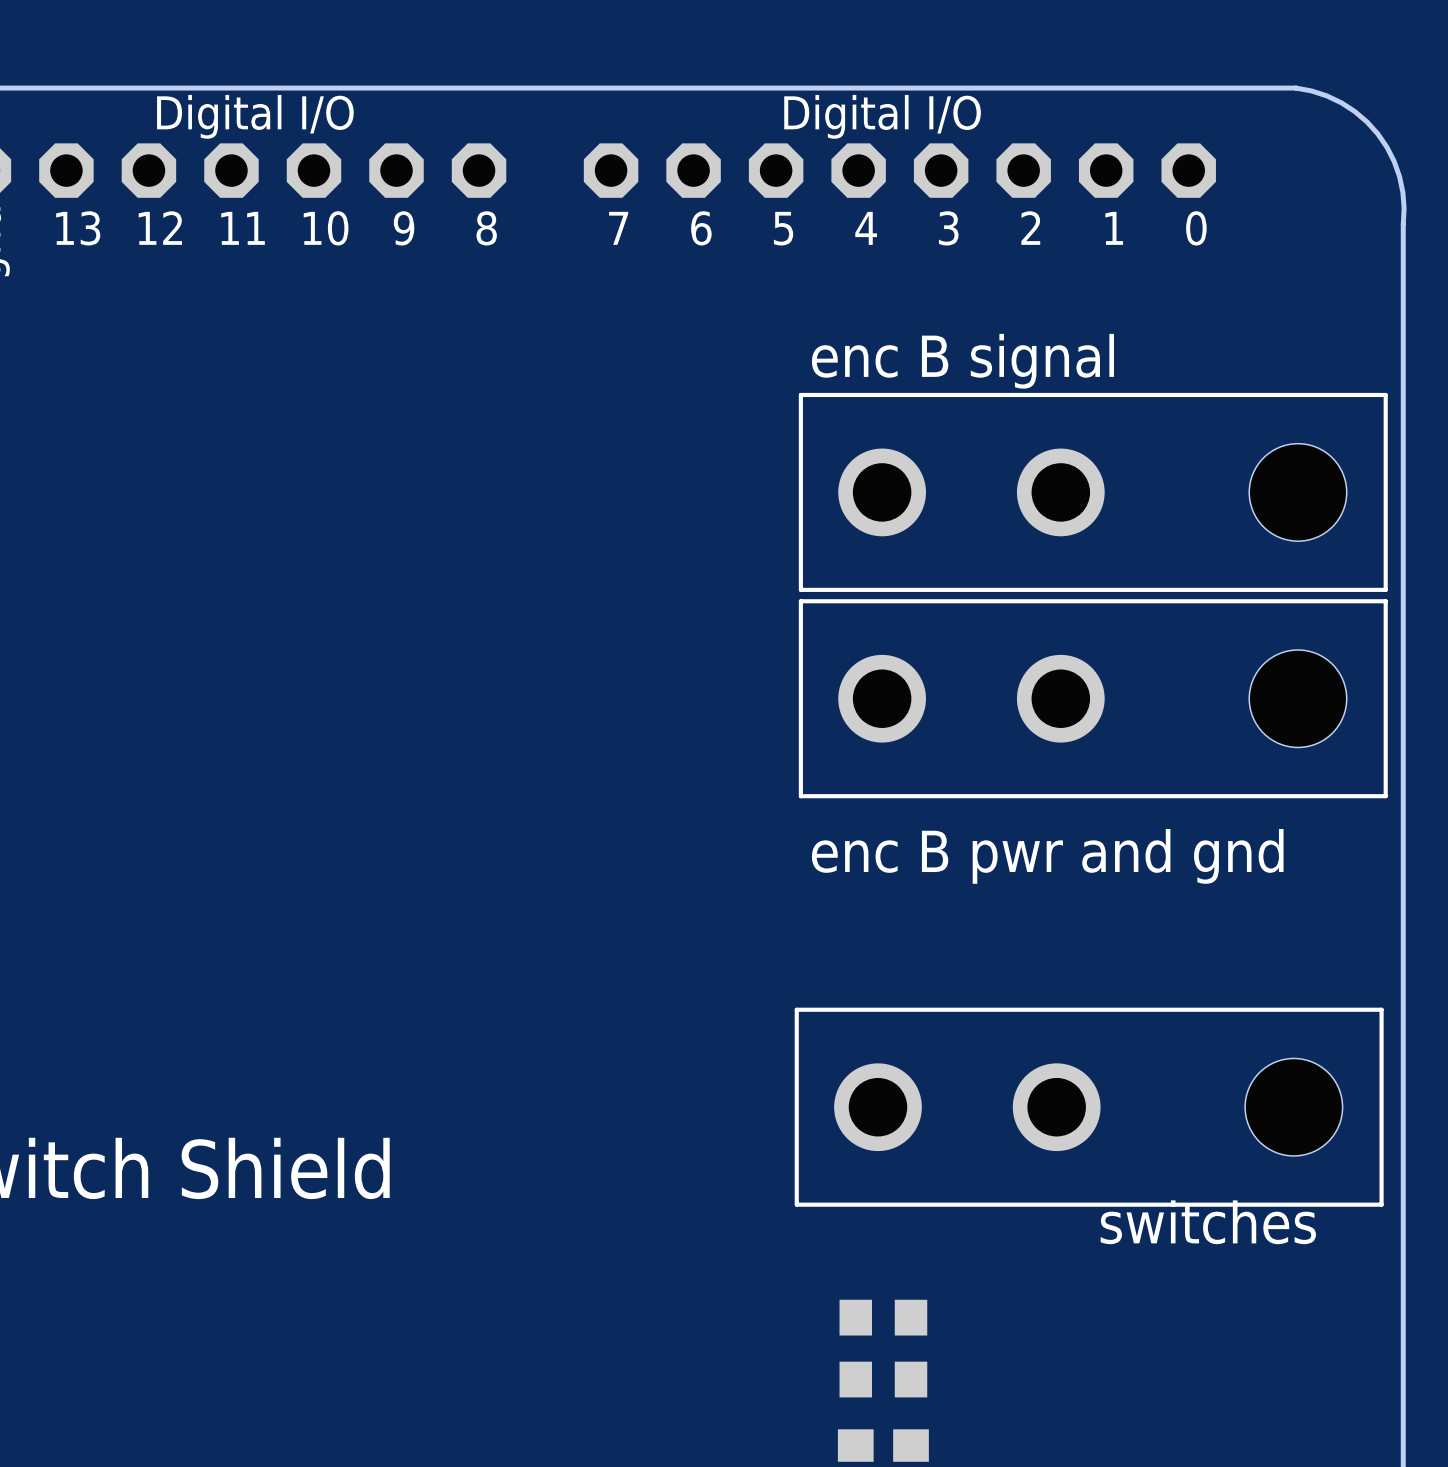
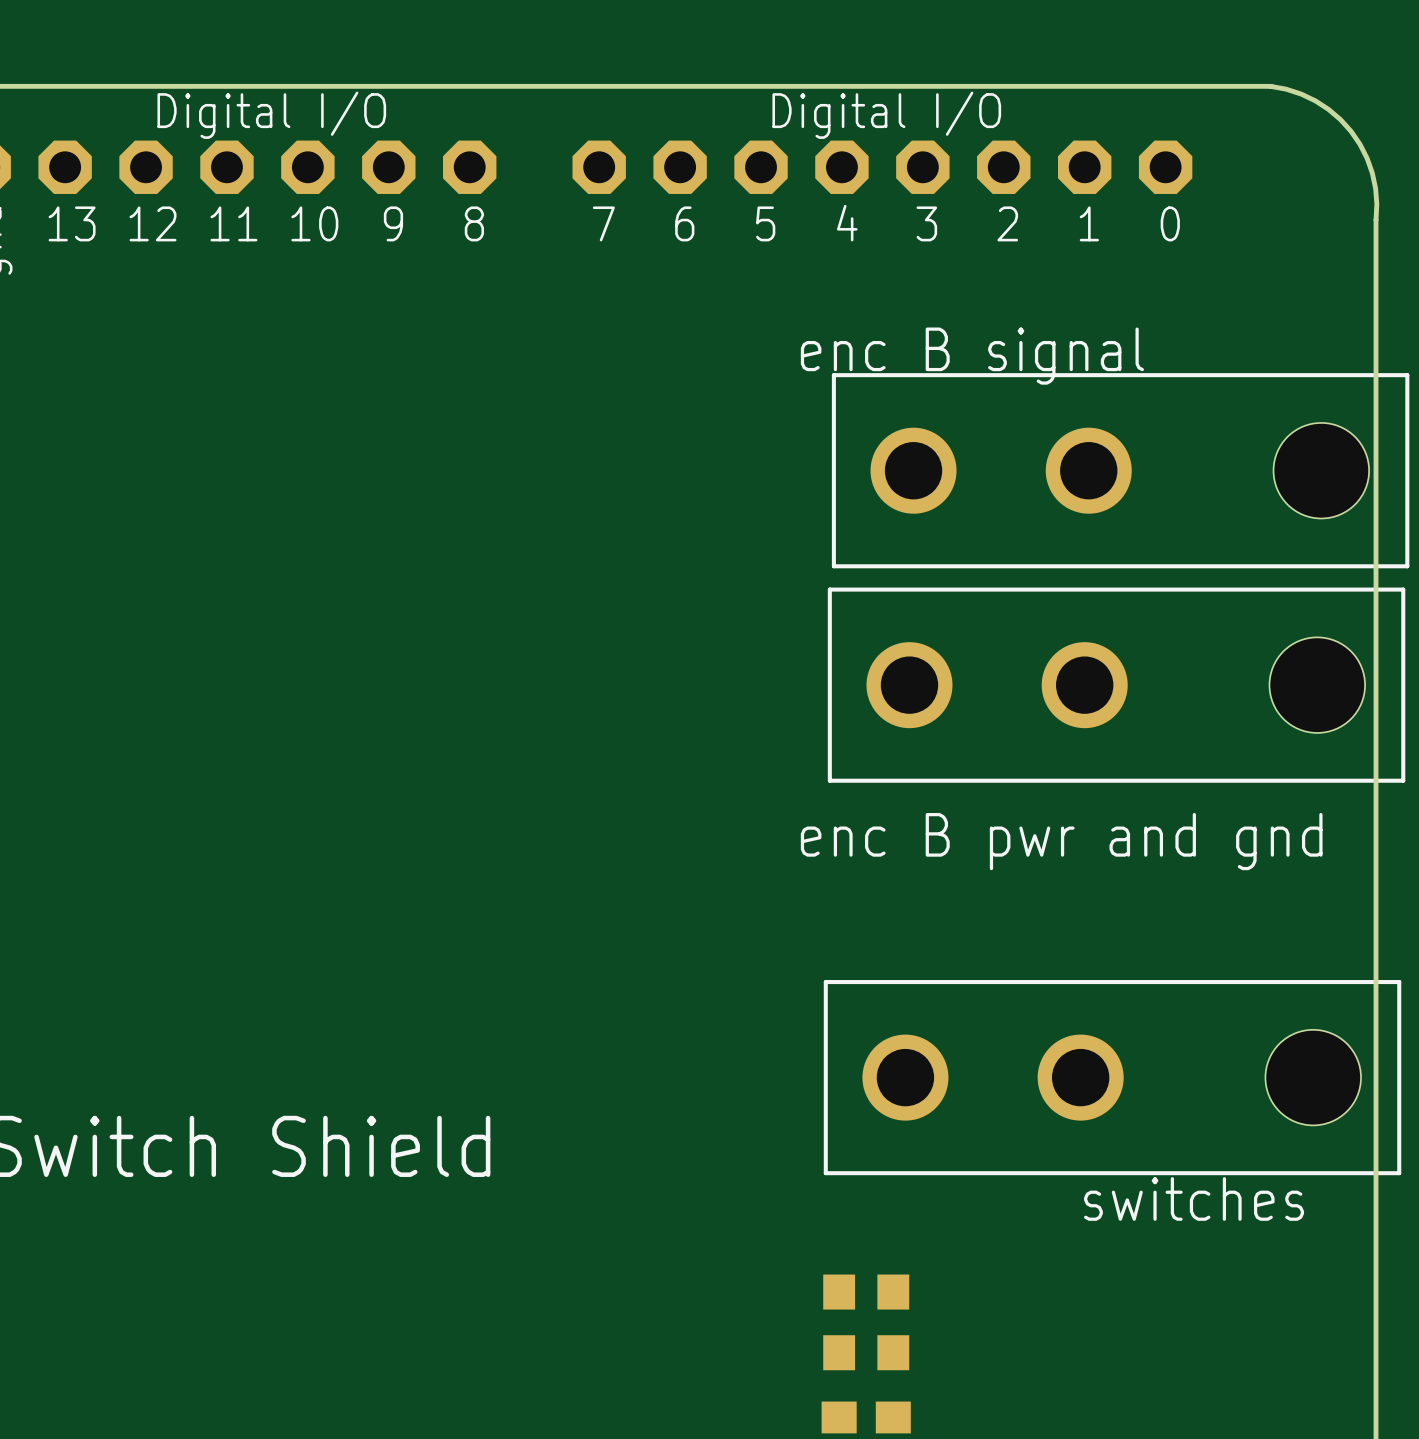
part position: (1093, 492) -> (1120, 470)
part position: (1093, 698) -> (1116, 685)
part position: (1089, 1107) -> (1112, 1077)

